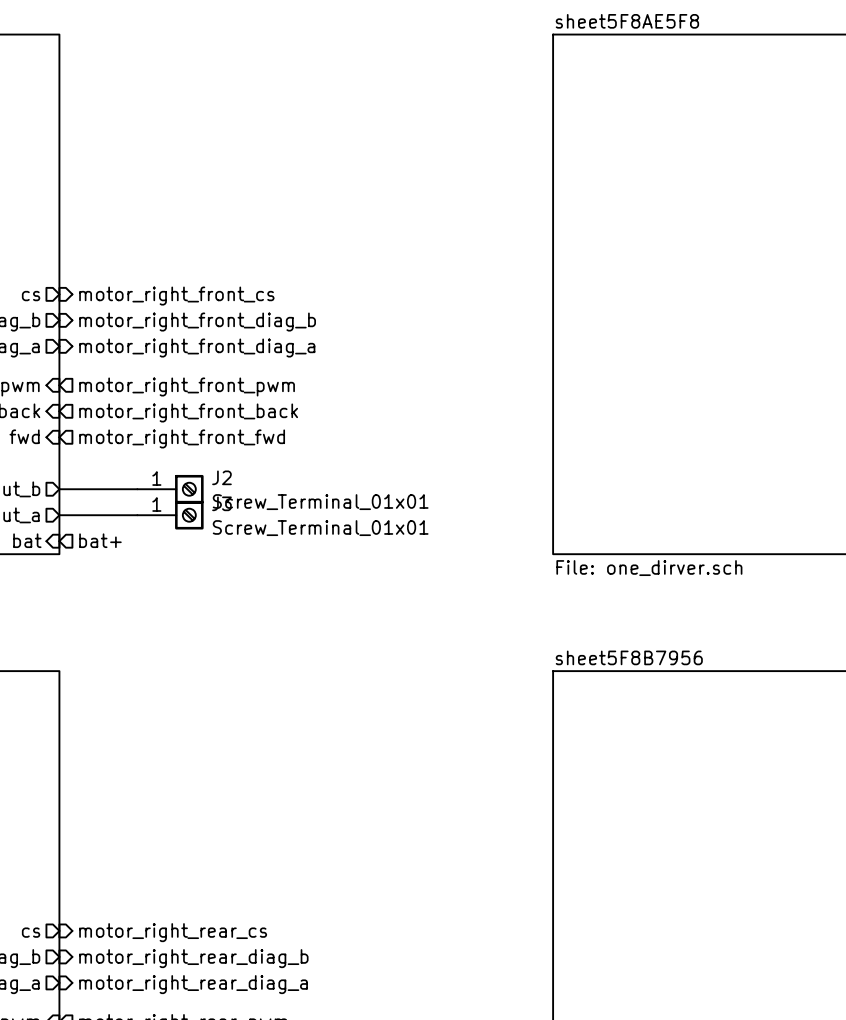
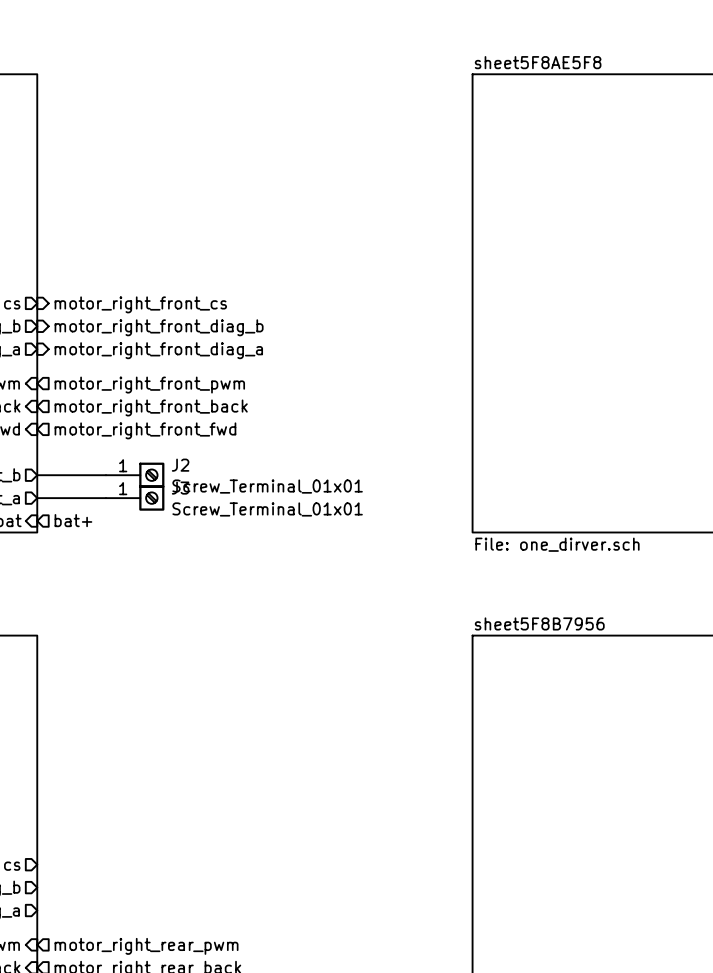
hierarchical label: motor_right_rear_cs (173, 932) -> none
hierarchical label: motor_right_rear_diag_b (193, 958) -> none
hierarchical label: motor_right_rear_diag_a (193, 984) -> none

